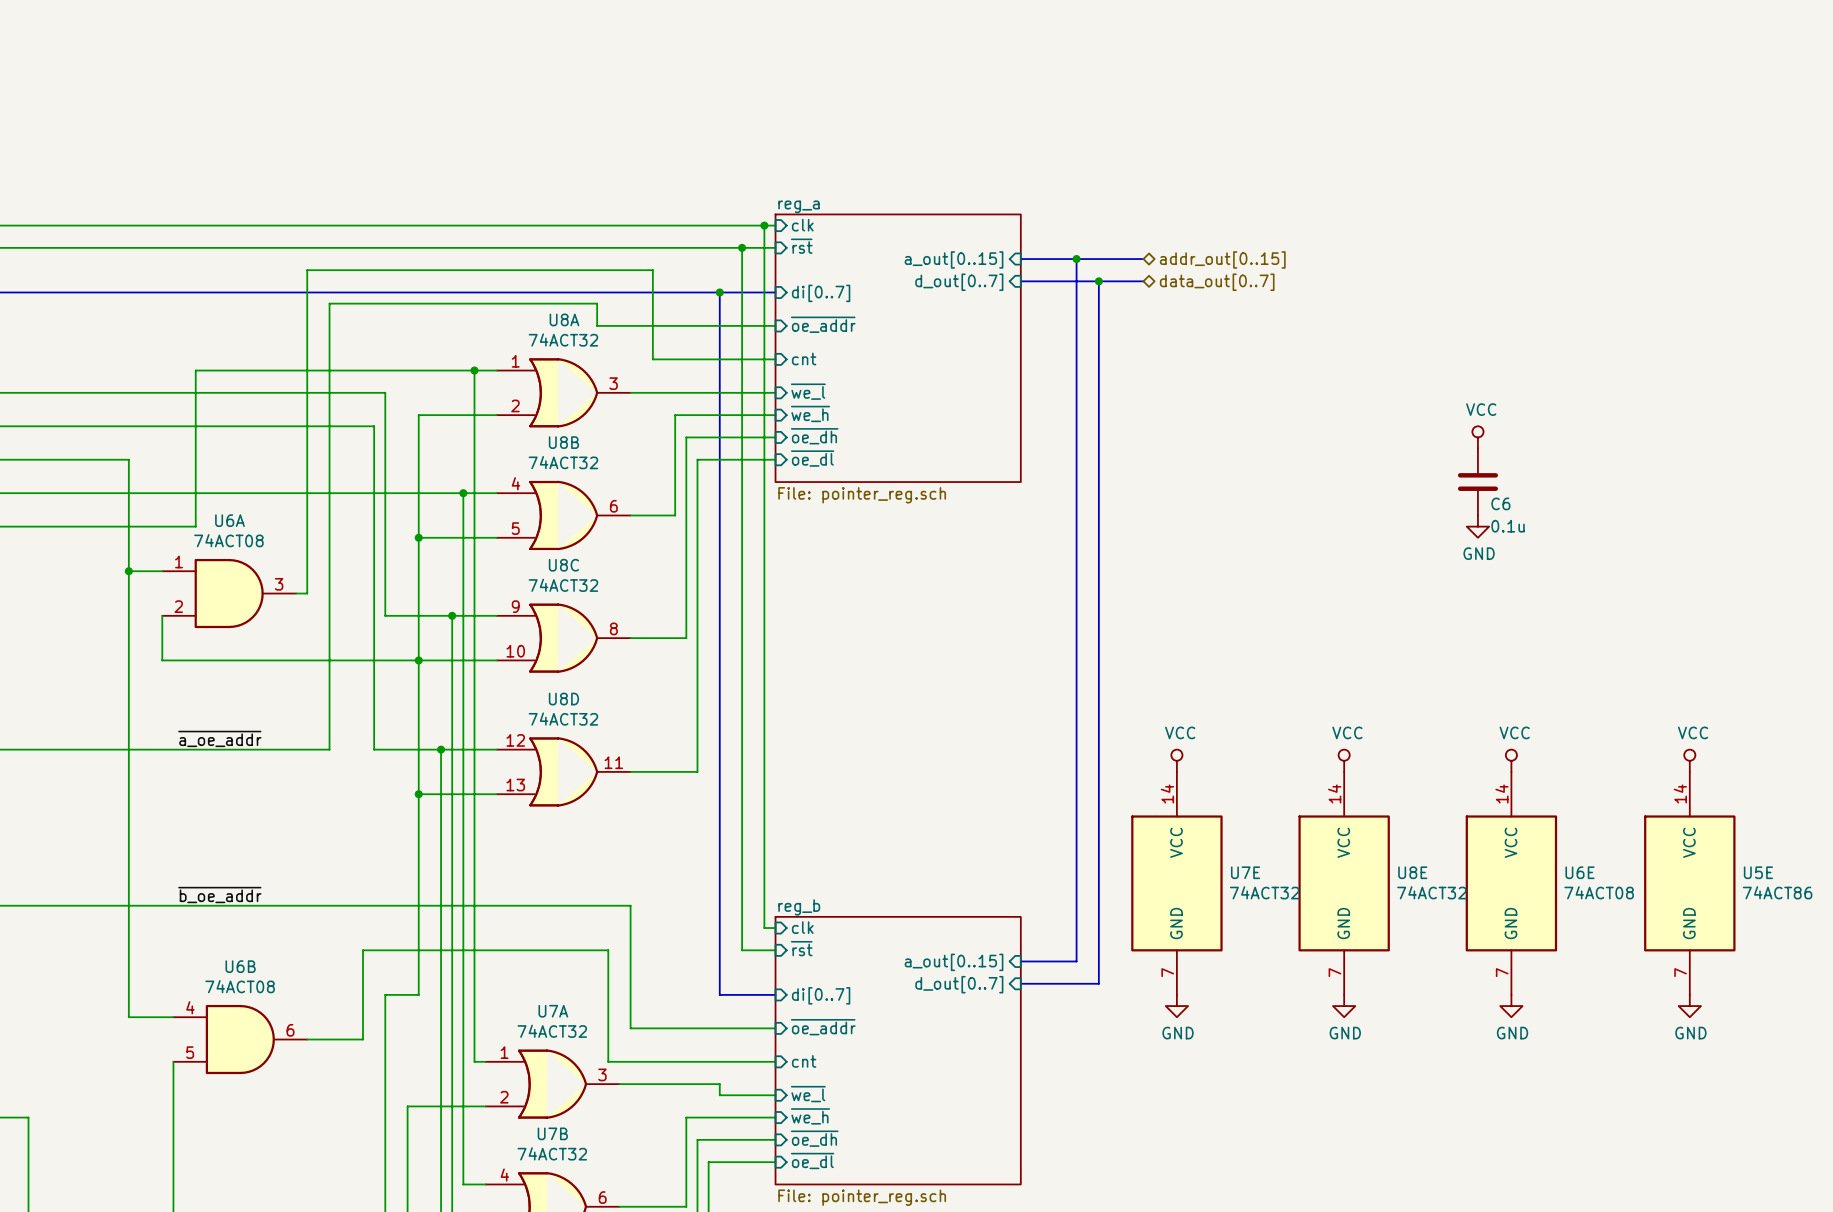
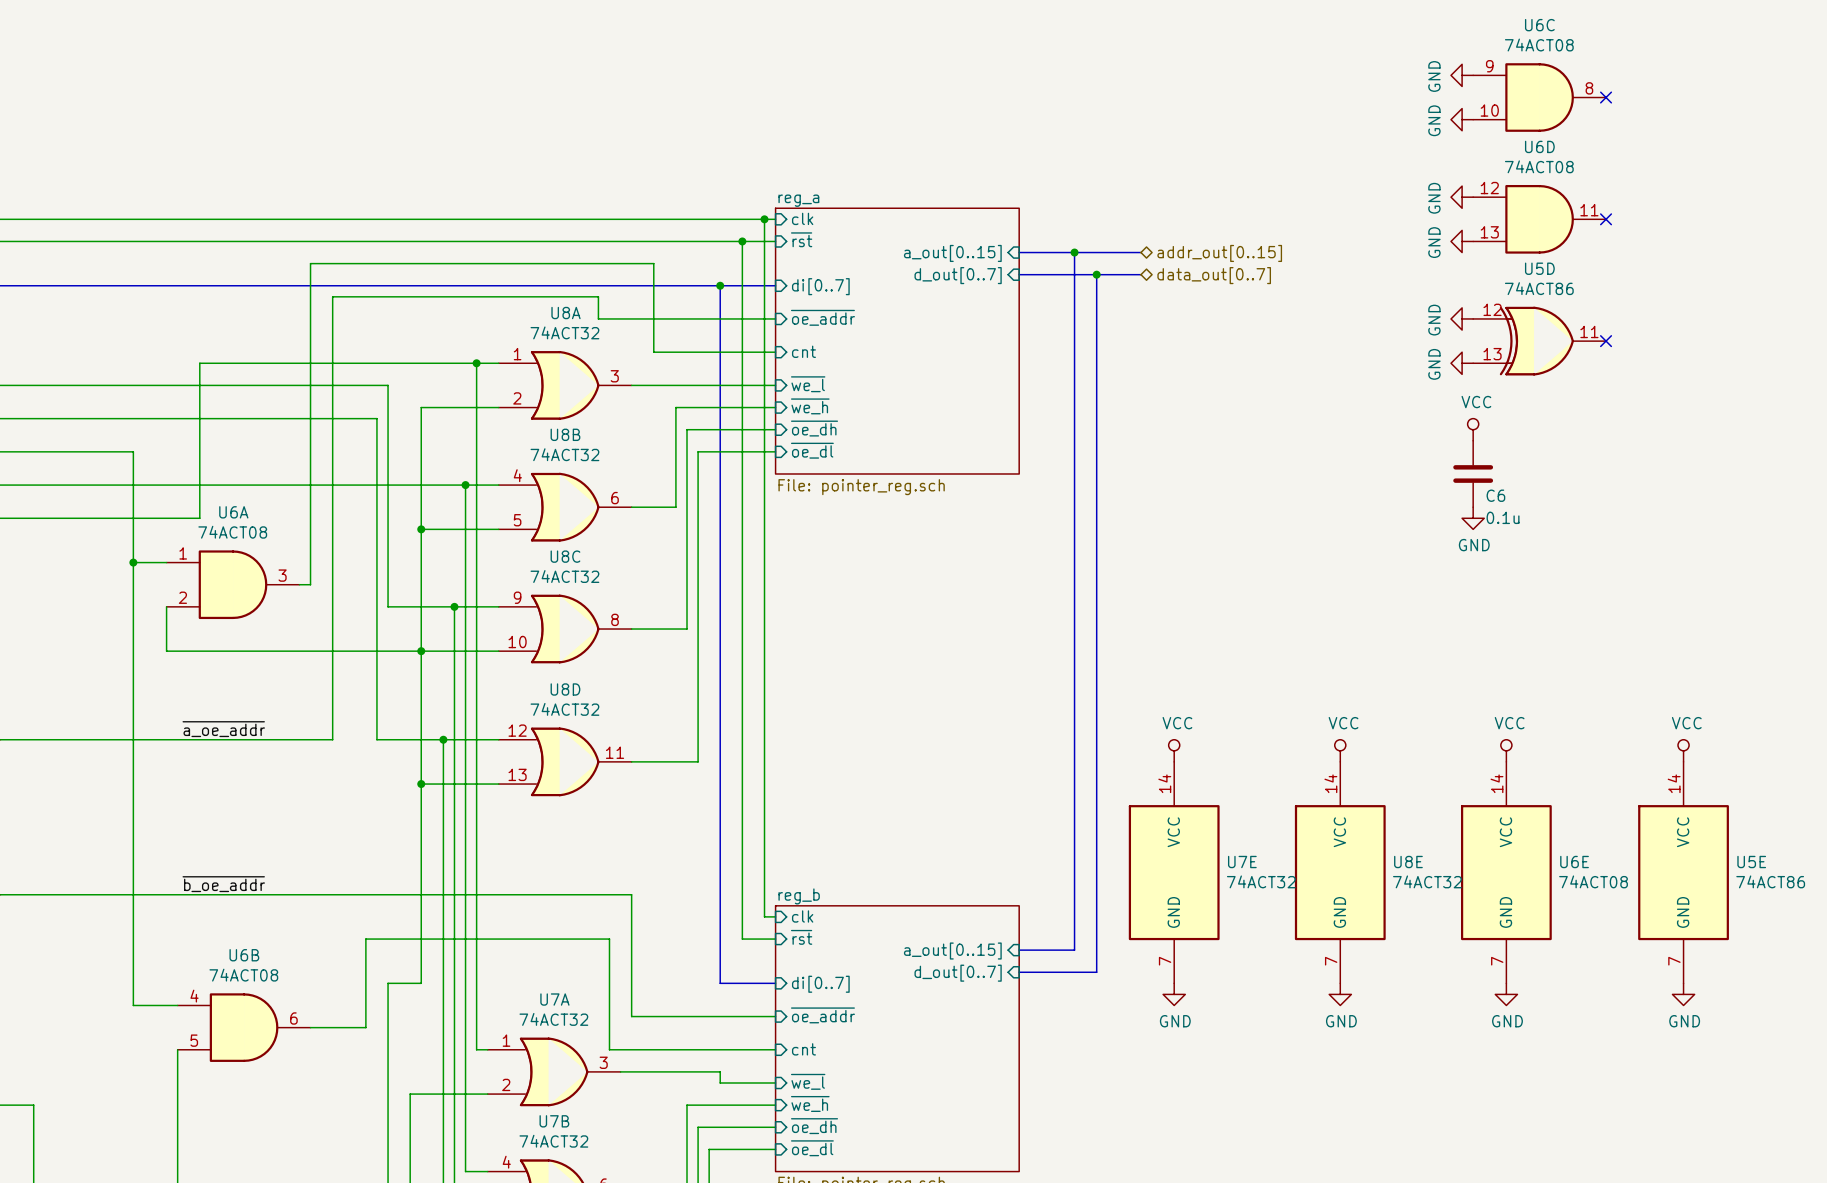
power symbol: none -> GND (1462, 75)
U6C: none -> 74ACT08 (1539, 97)
no-connect mark: none -> (1606, 97)
power symbol: none -> GND (1462, 119)
power symbol: none -> GND (1462, 197)
U6D: none -> 74ACT08 (1539, 219)
no-connect mark: none -> (1606, 219)
power symbol: none -> GND (1462, 241)
power symbol: none -> GND (1462, 318)
U5D: none -> 74ACT86 (1539, 341)
no-connect mark: none -> (1606, 341)
power symbol: none -> GND (1462, 363)

